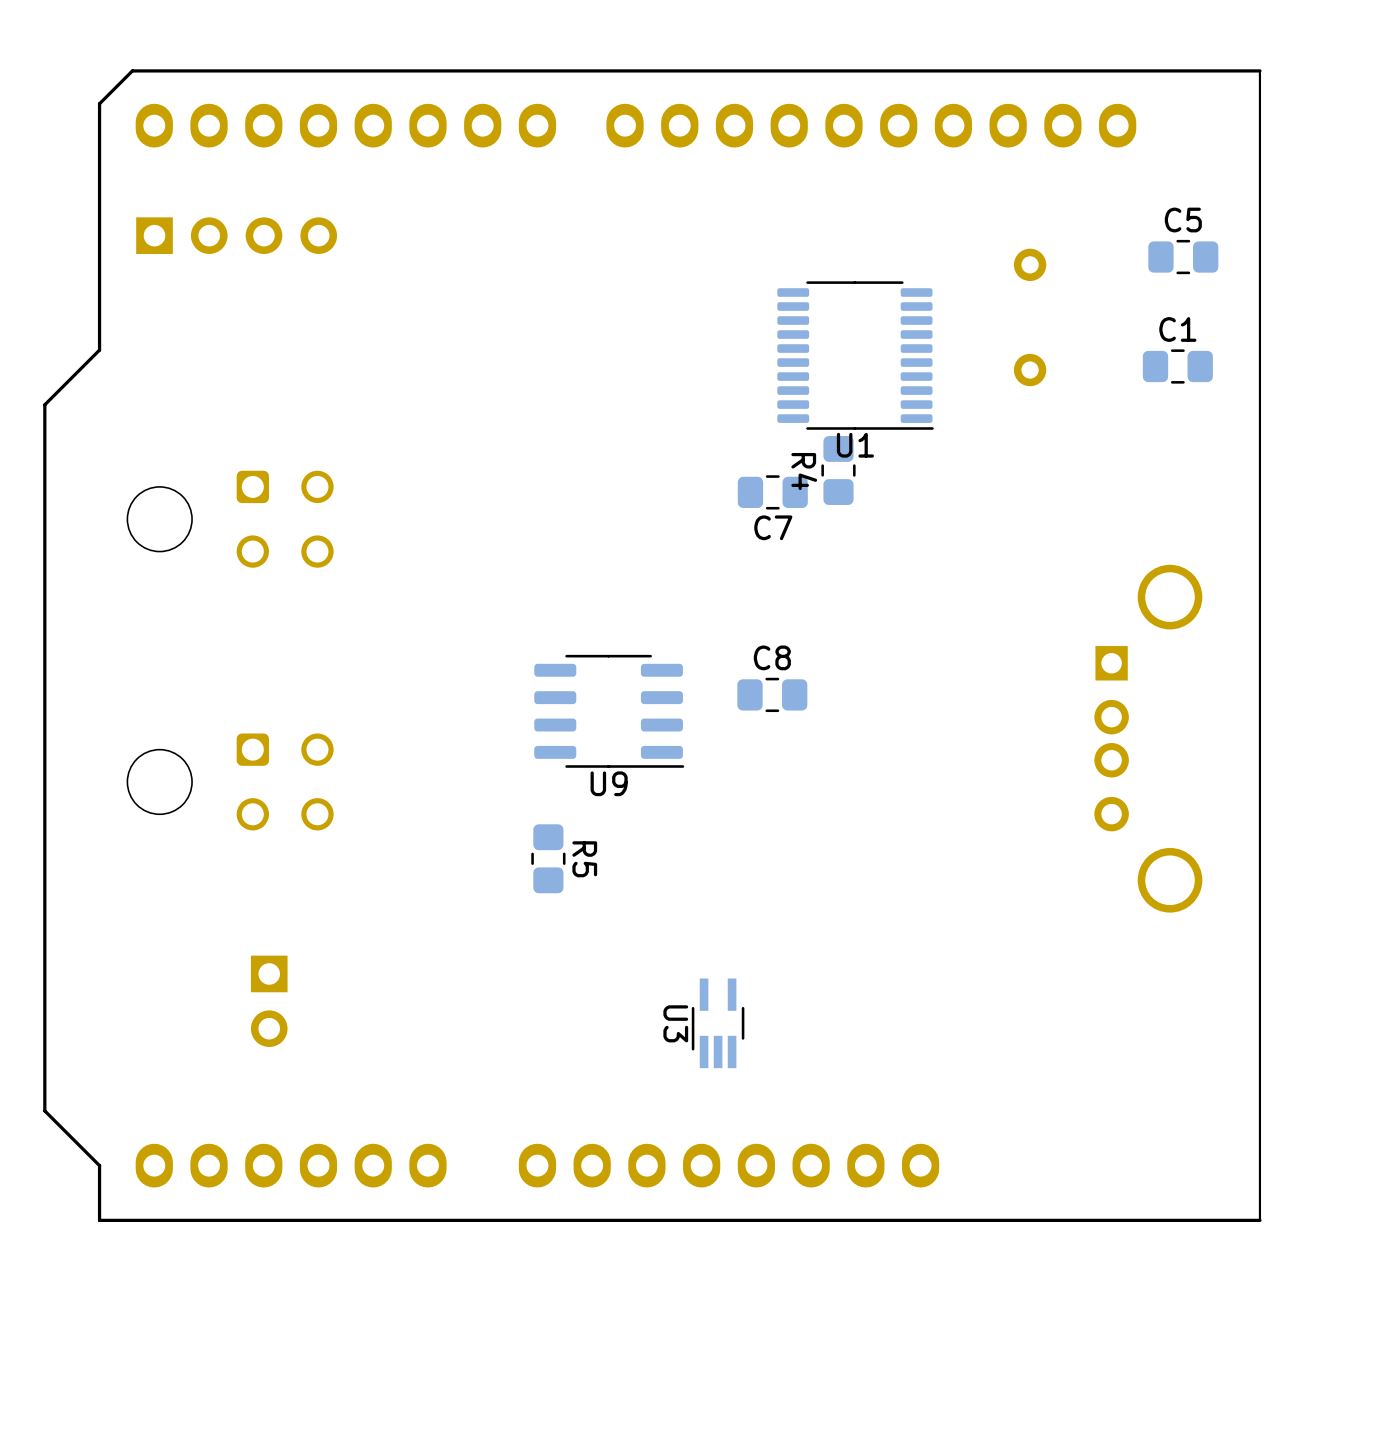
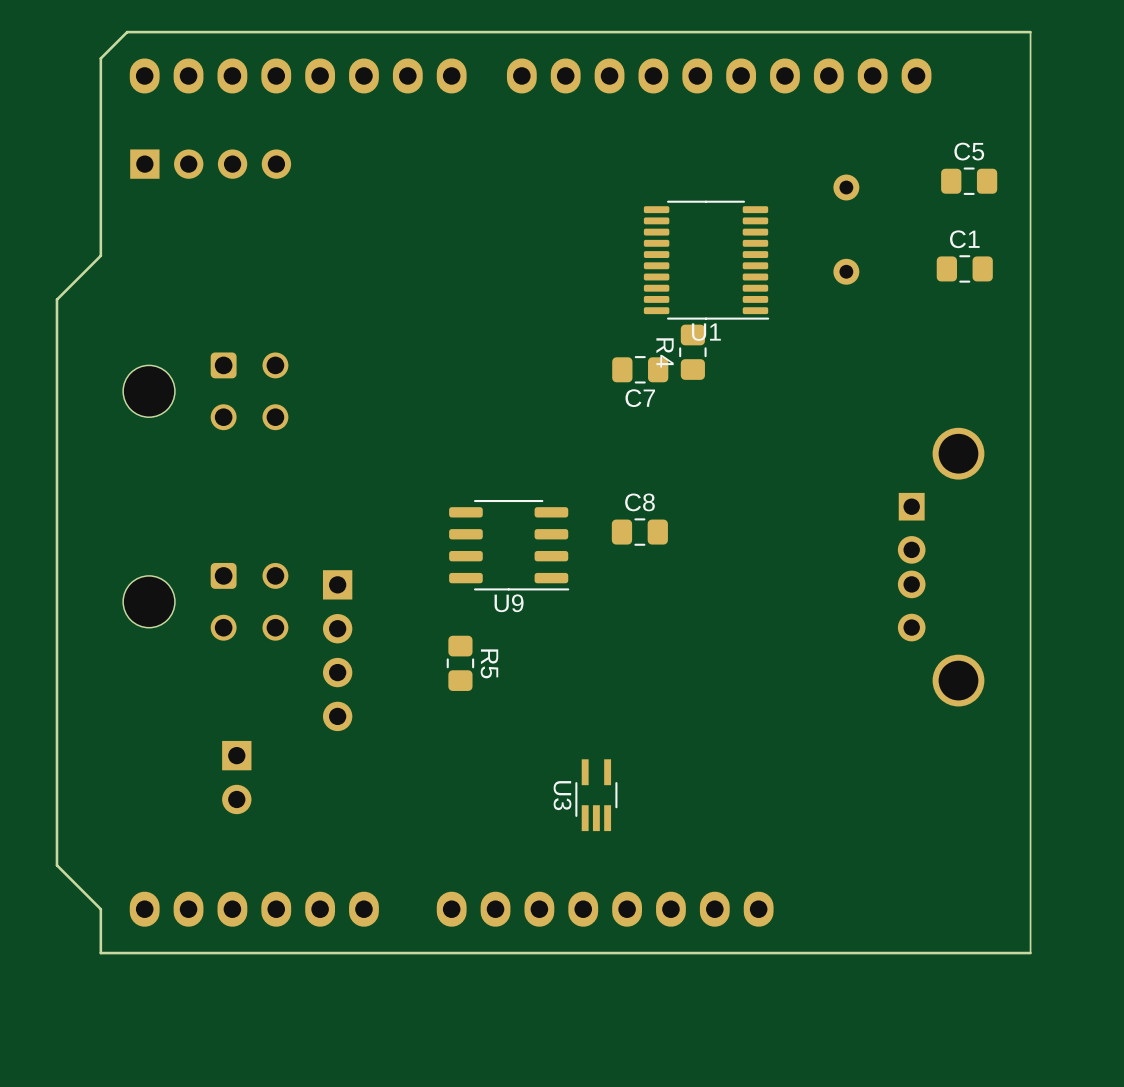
part: none -> (337, 650)

